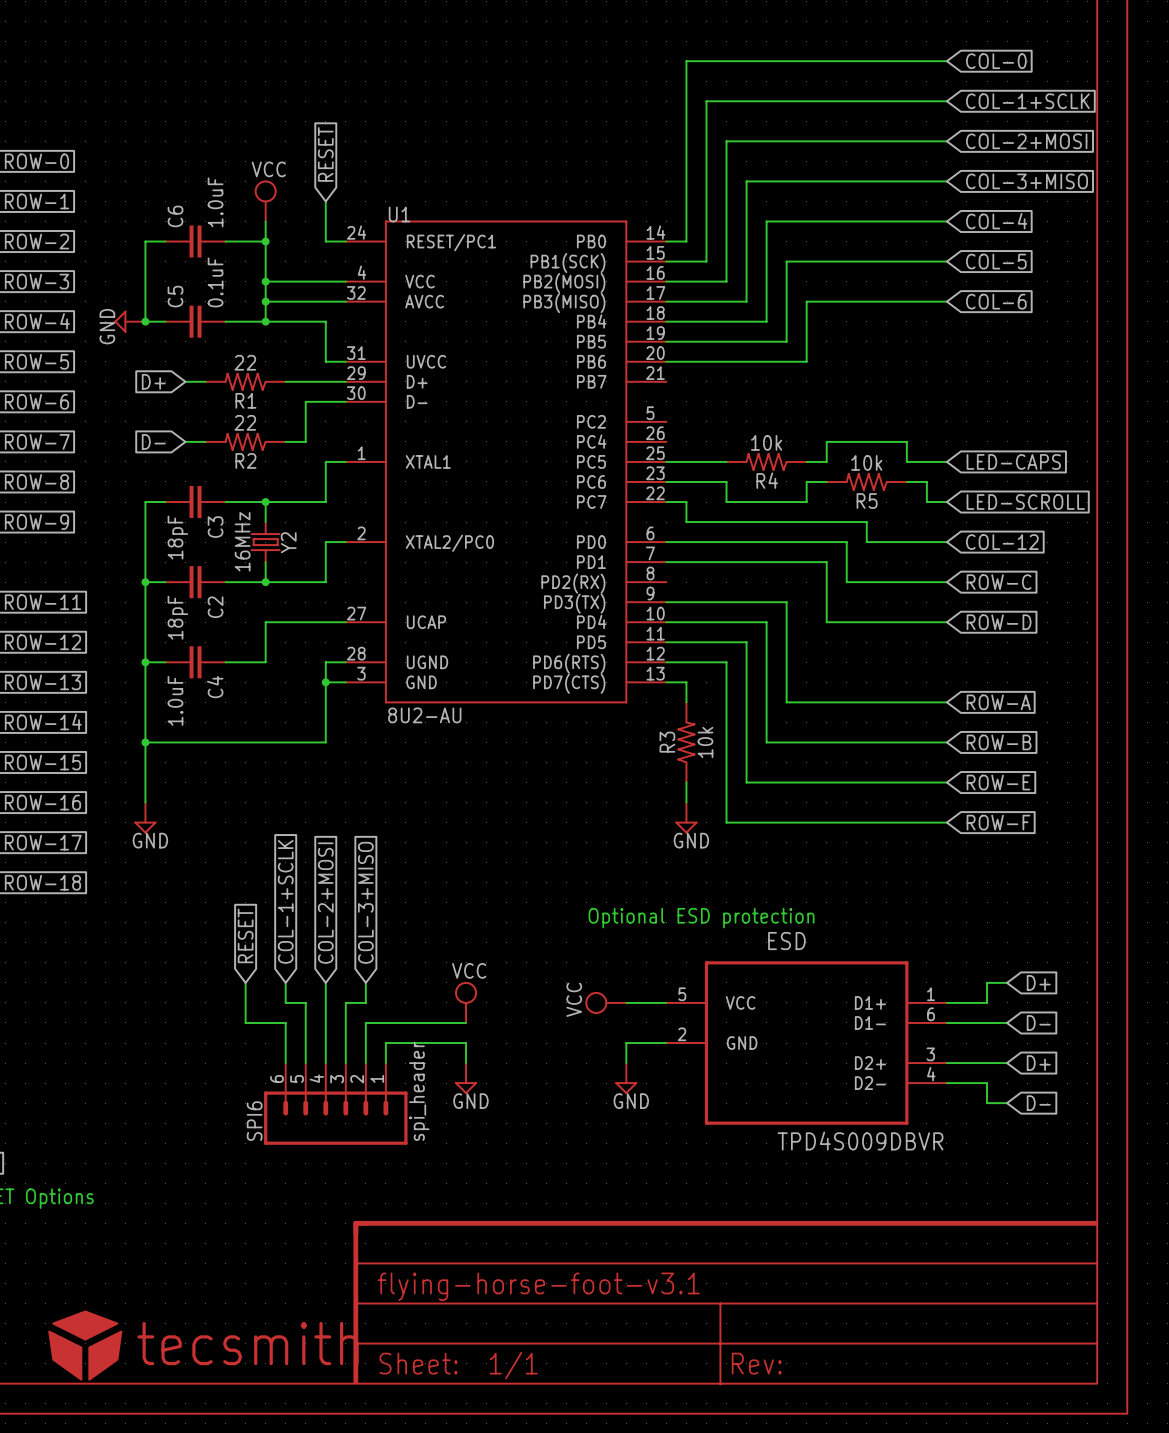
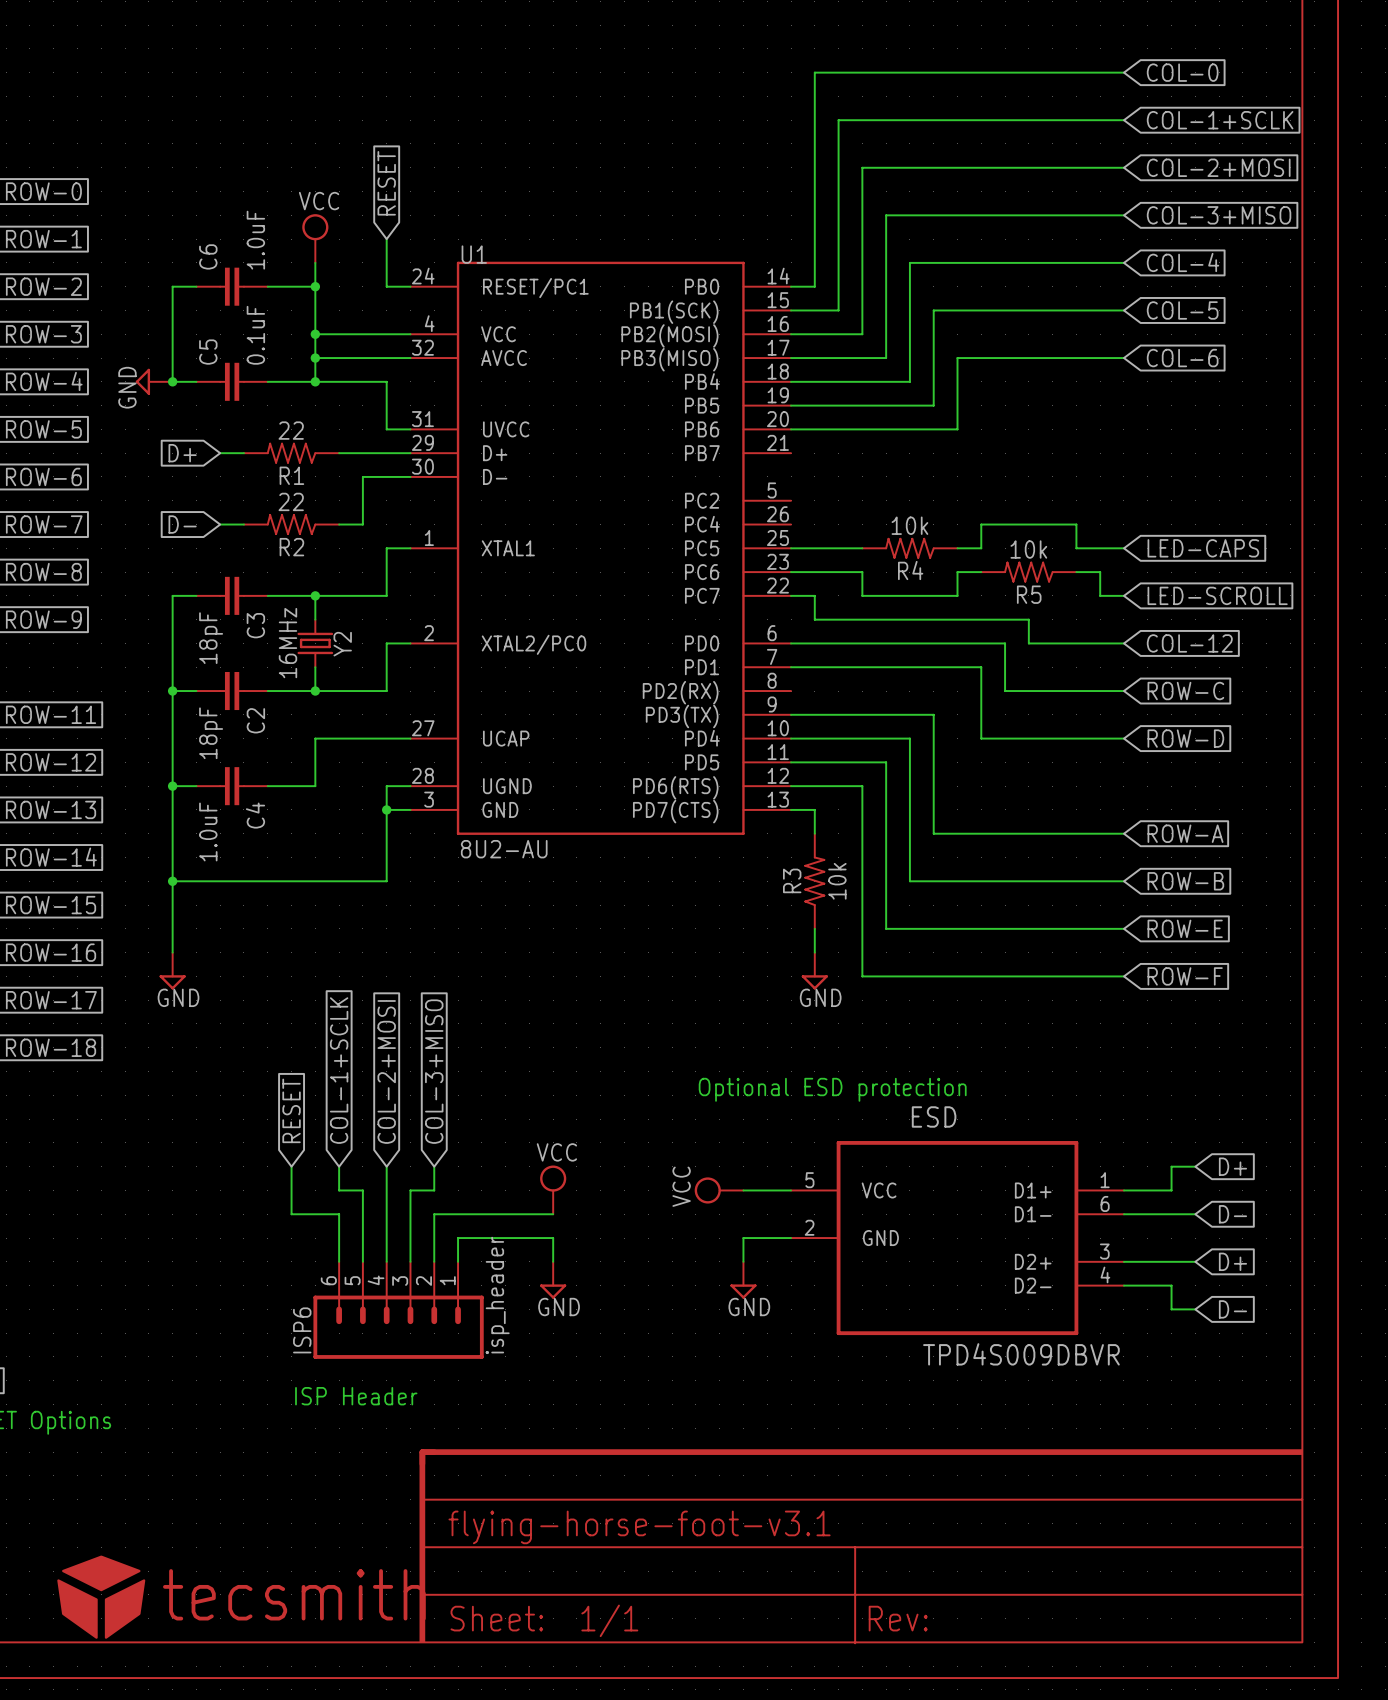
SPI6 value: spi_header (419, 1091) -> isp_header (497, 1295)
SPI6 name: SPI6 (254, 1121) -> ISP6 (302, 1330)
text: none -> ISP Header (356, 1396)

